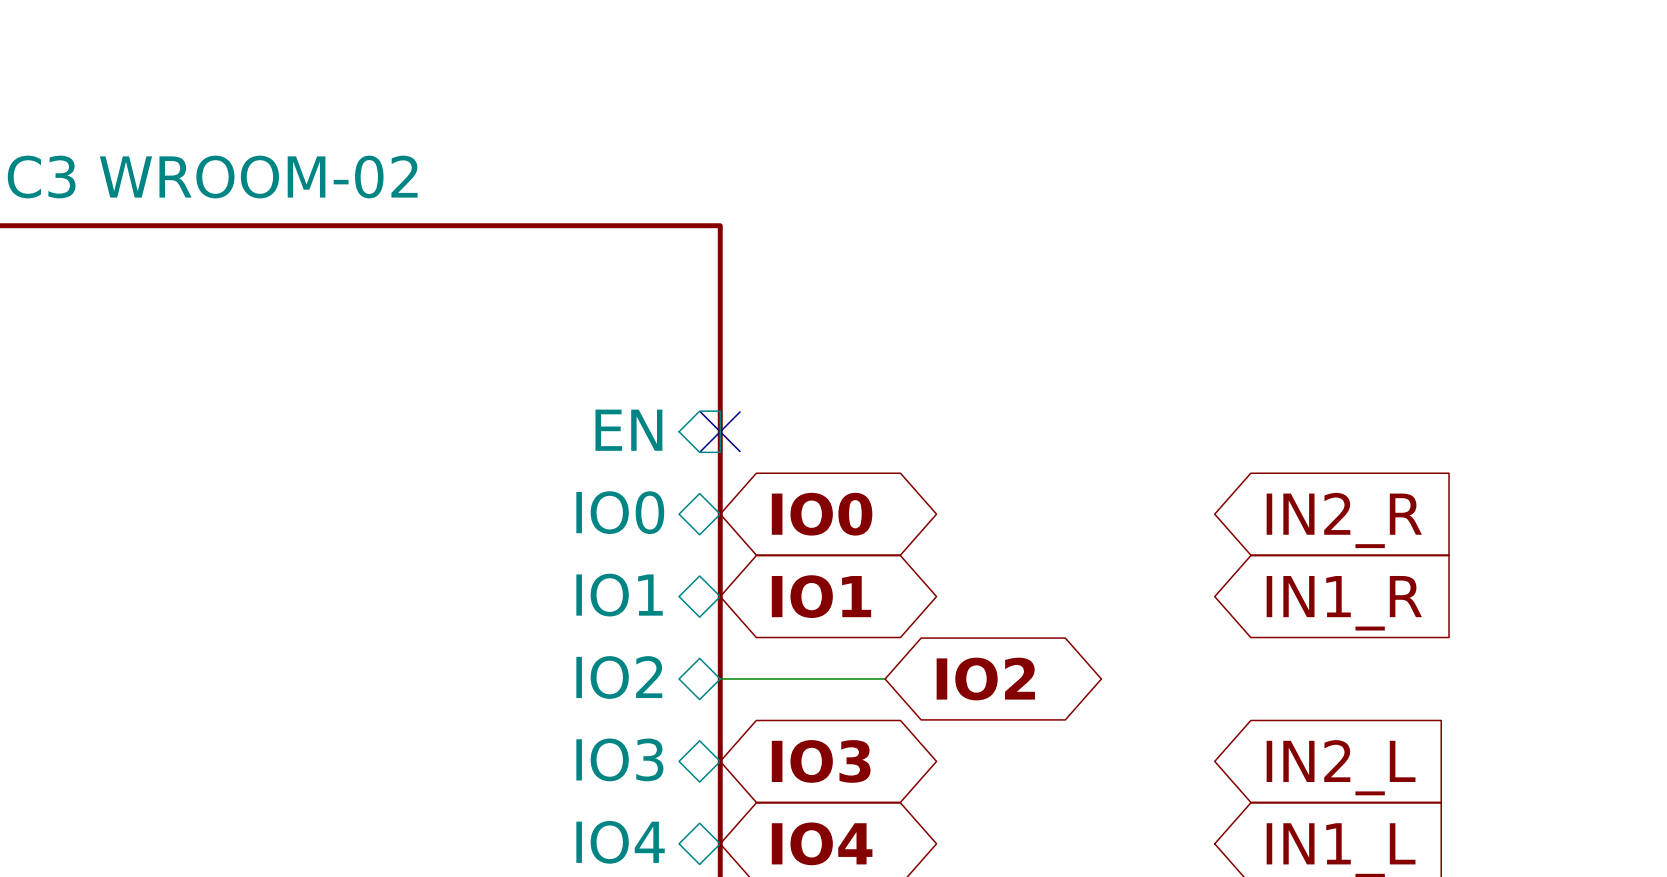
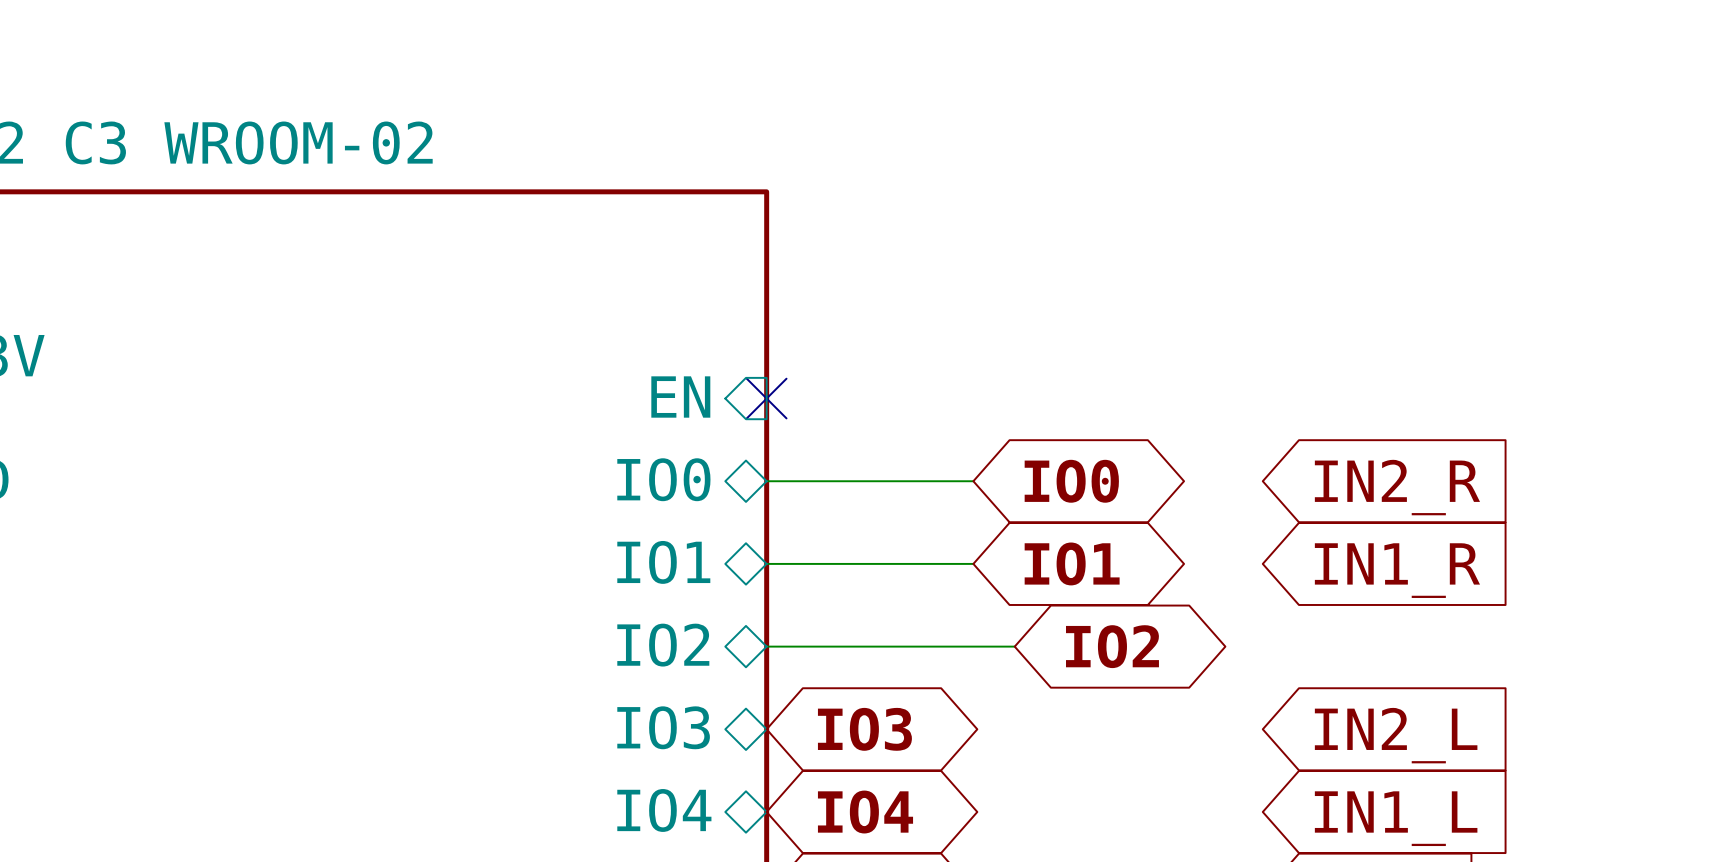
wire: none -> (766, 481) (973, 481)
global label position: IO0 (822, 514) -> IO0 (1071, 481)
wire: none -> (766, 563) (973, 563)
global label position: IO1 (821, 596) -> IO1 (1072, 563)
wire: none -> (932, 646) (1014, 646)
global label position: IO2 (985, 679) -> IO2 (1112, 646)

